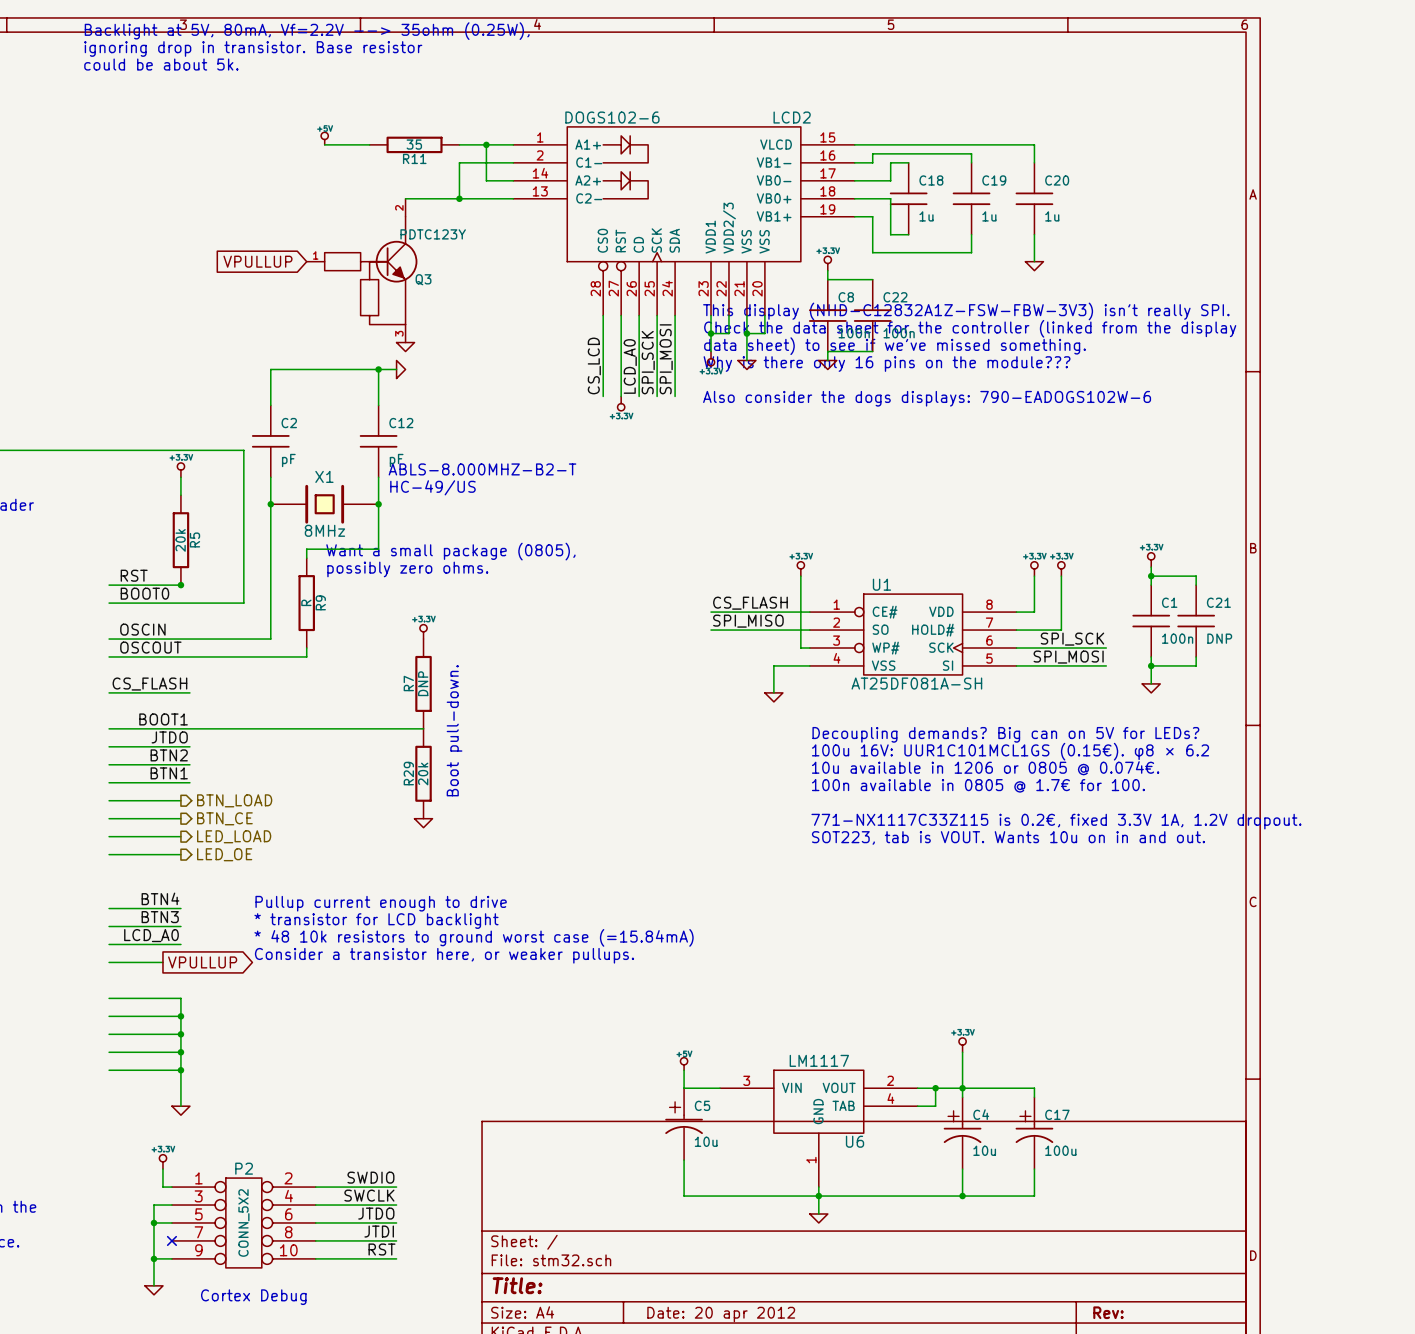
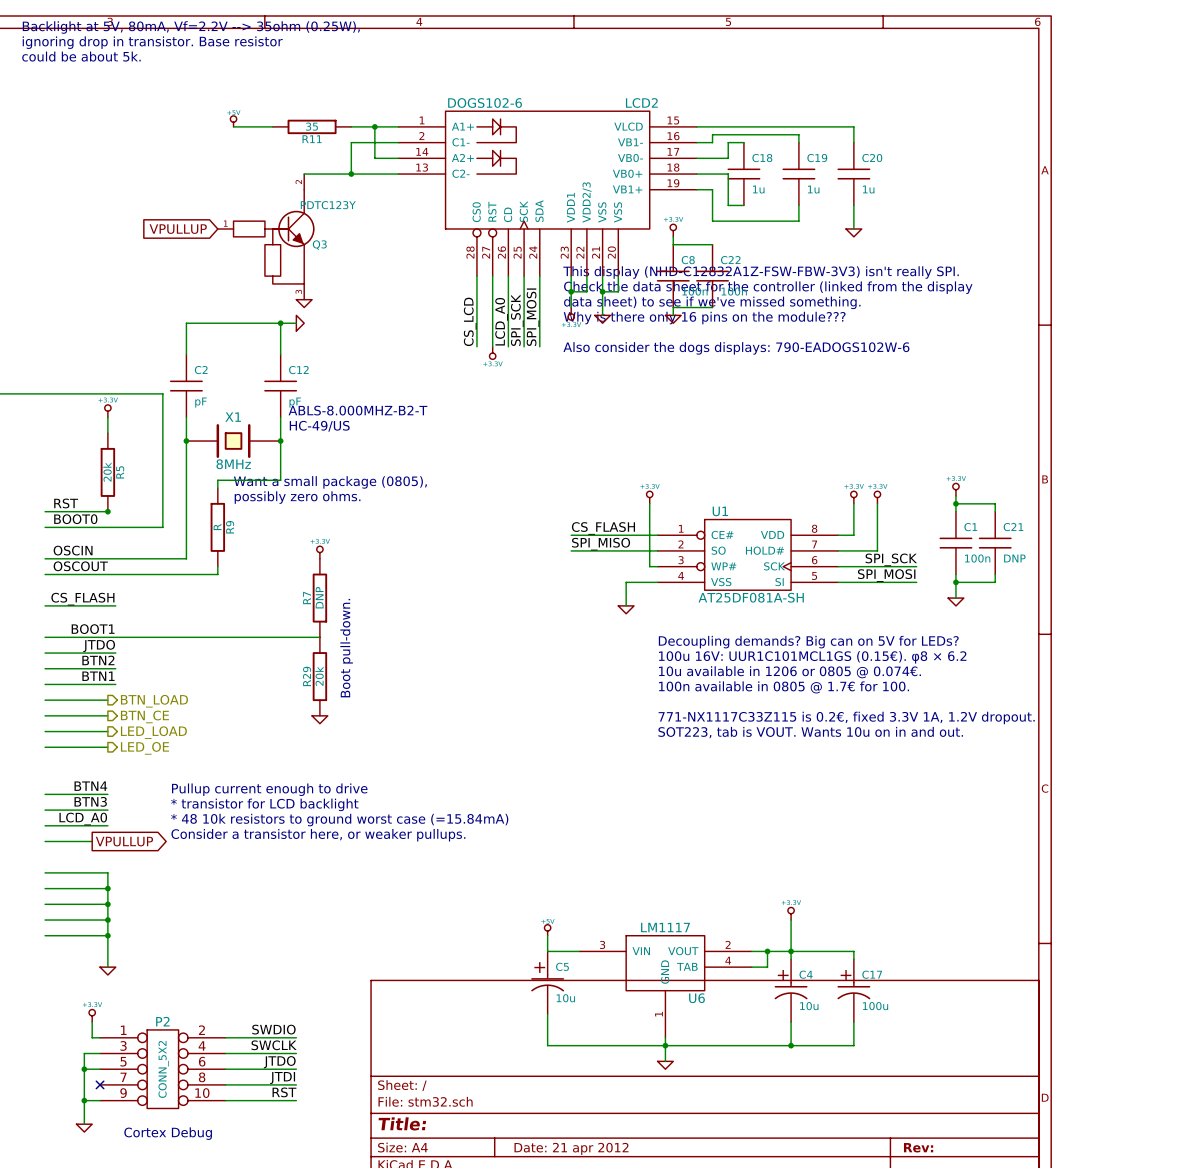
title block: Date: 20 apr 2012 (721, 1314) -> Date: 21 apr 2012 (571, 1148)

